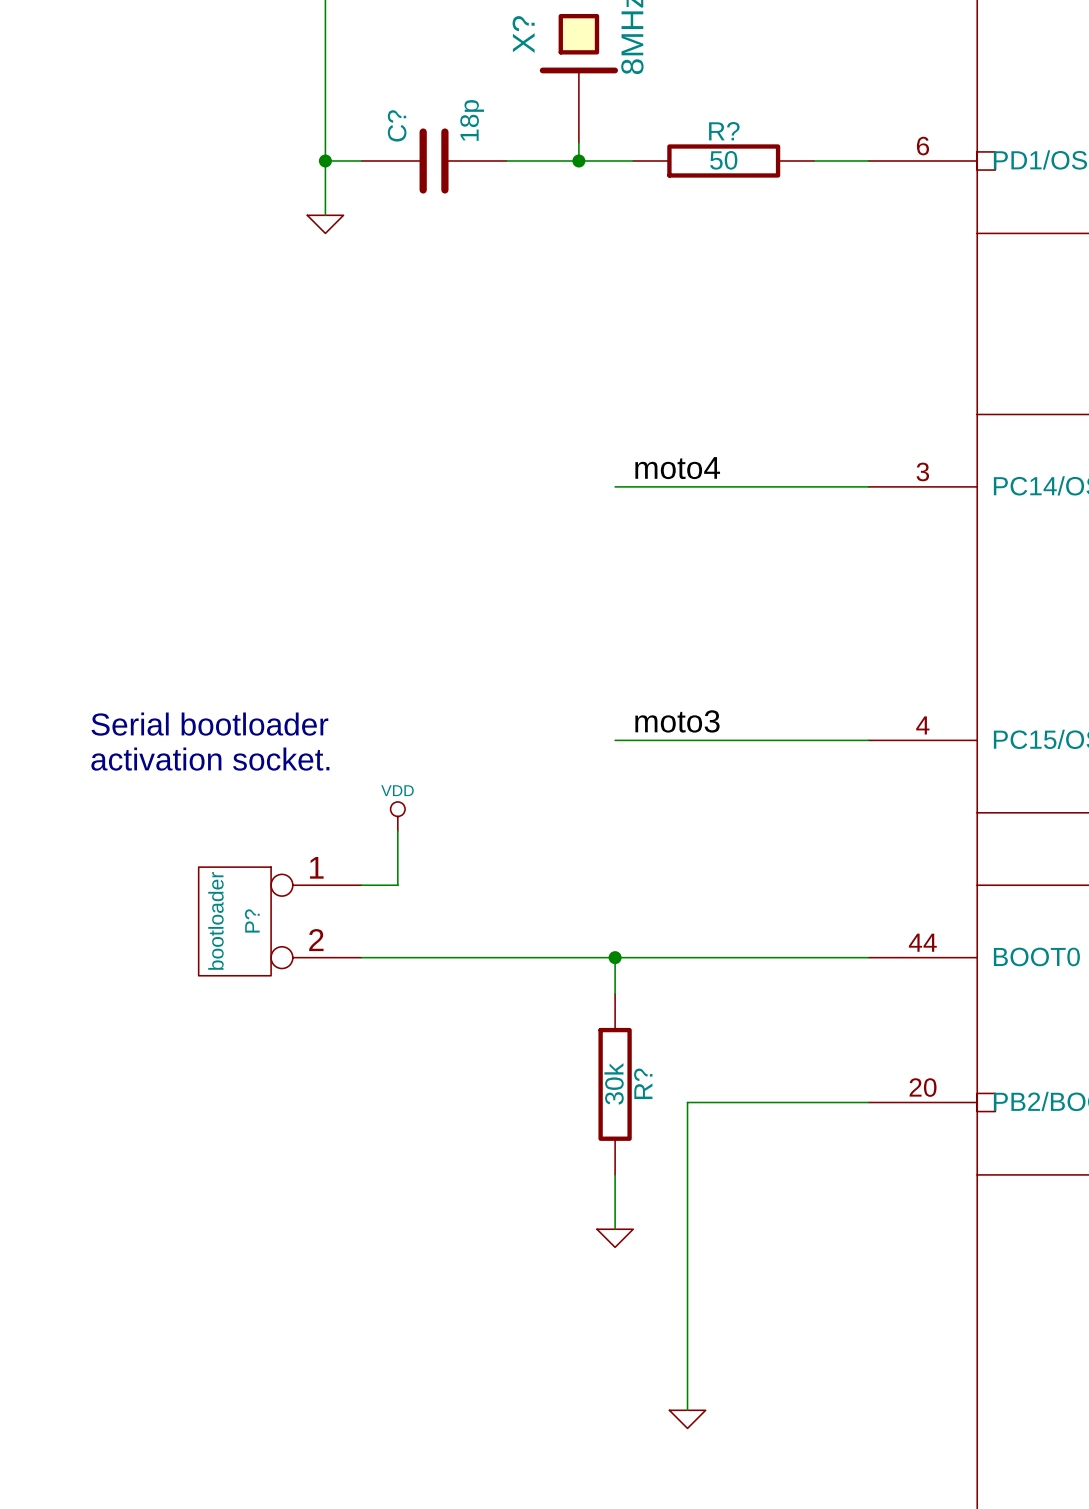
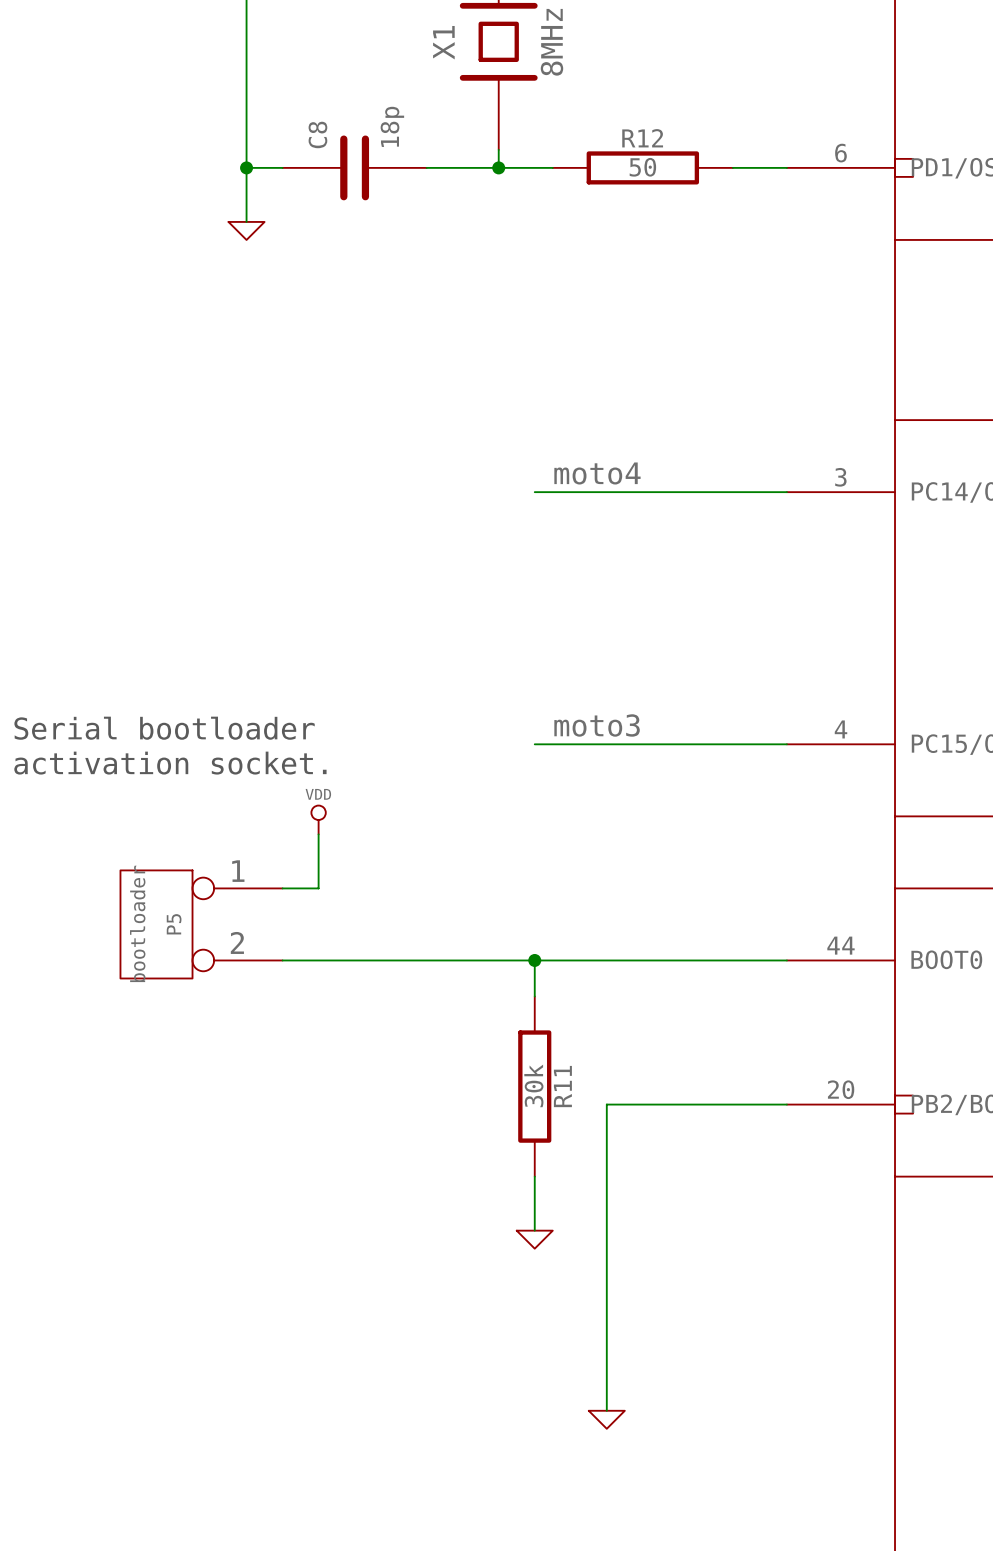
X? name: X? (523, 34) -> X1 (443, 42)
C? name: C? (397, 125) -> C8 (317, 134)
R? name: R? (724, 131) -> R12 (642, 138)
P? name: P? (252, 920) -> P5 (174, 924)
R? name: R? (643, 1083) -> R11 (562, 1086)

